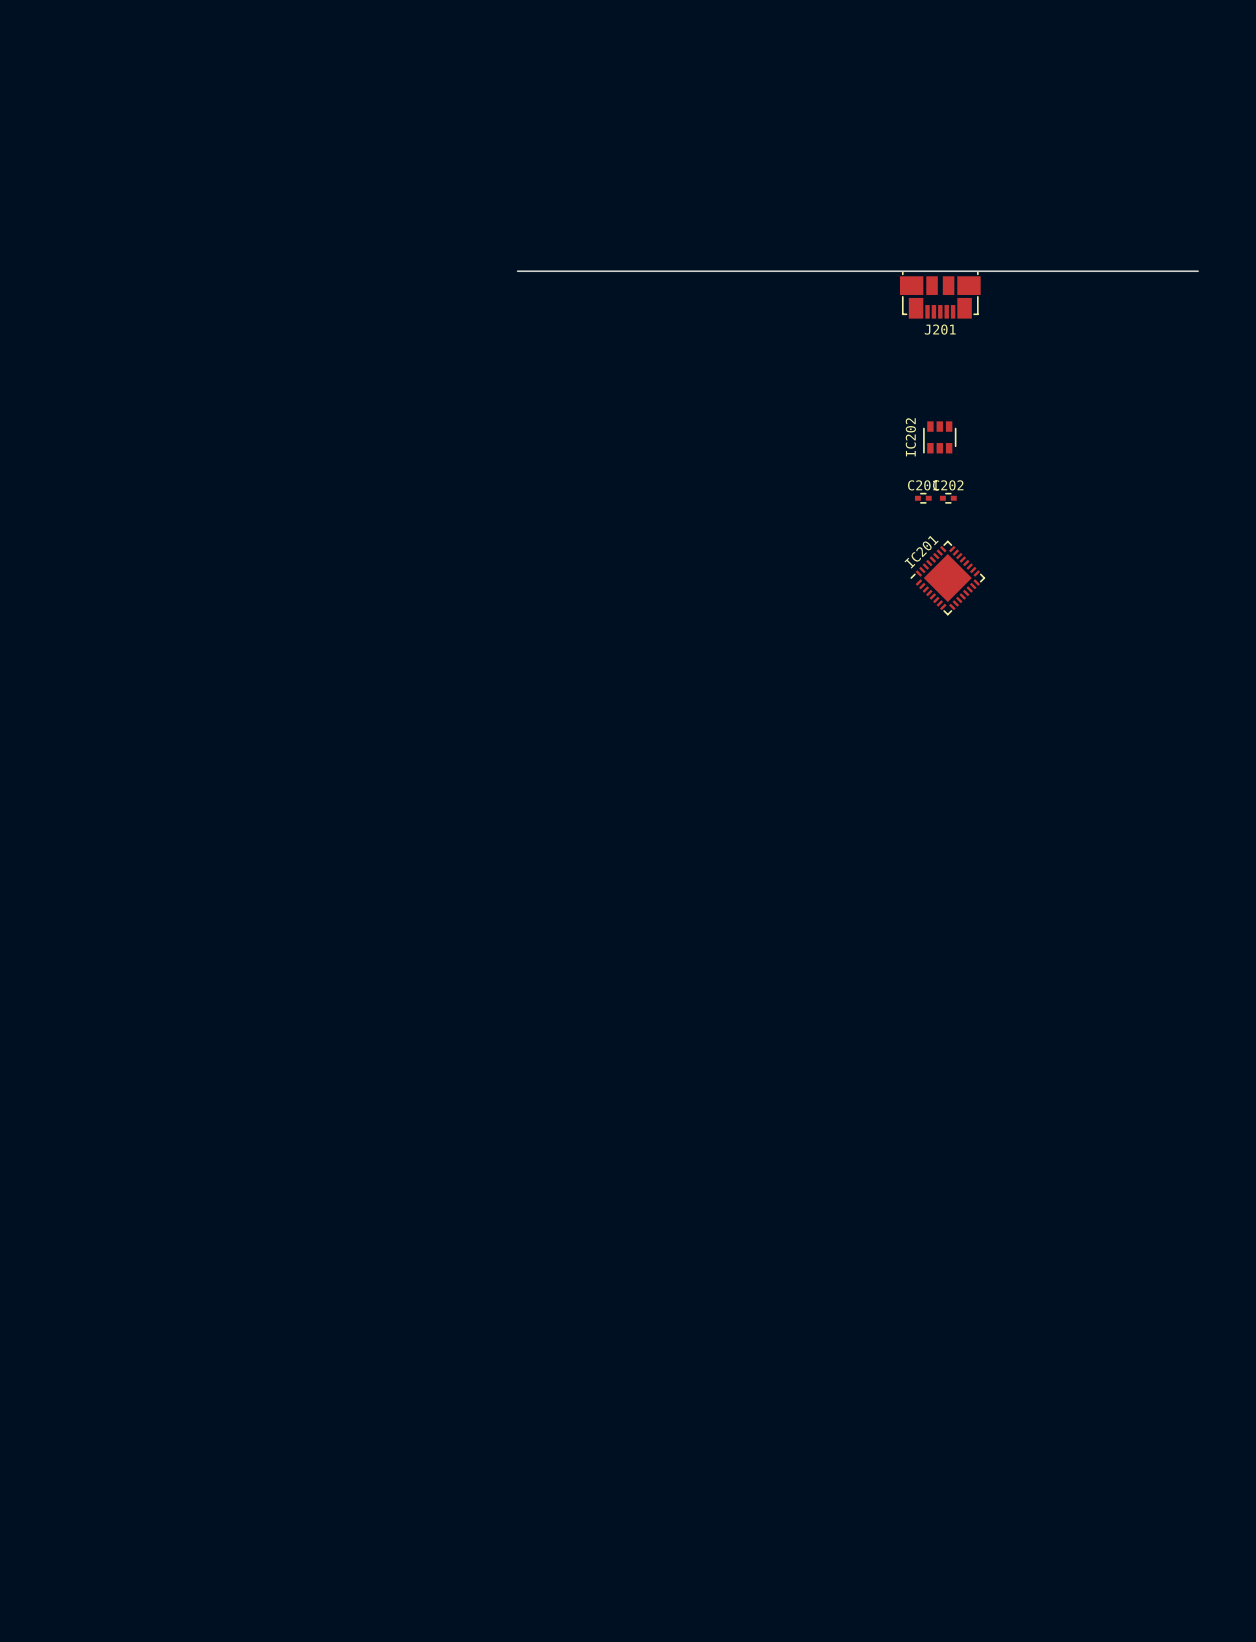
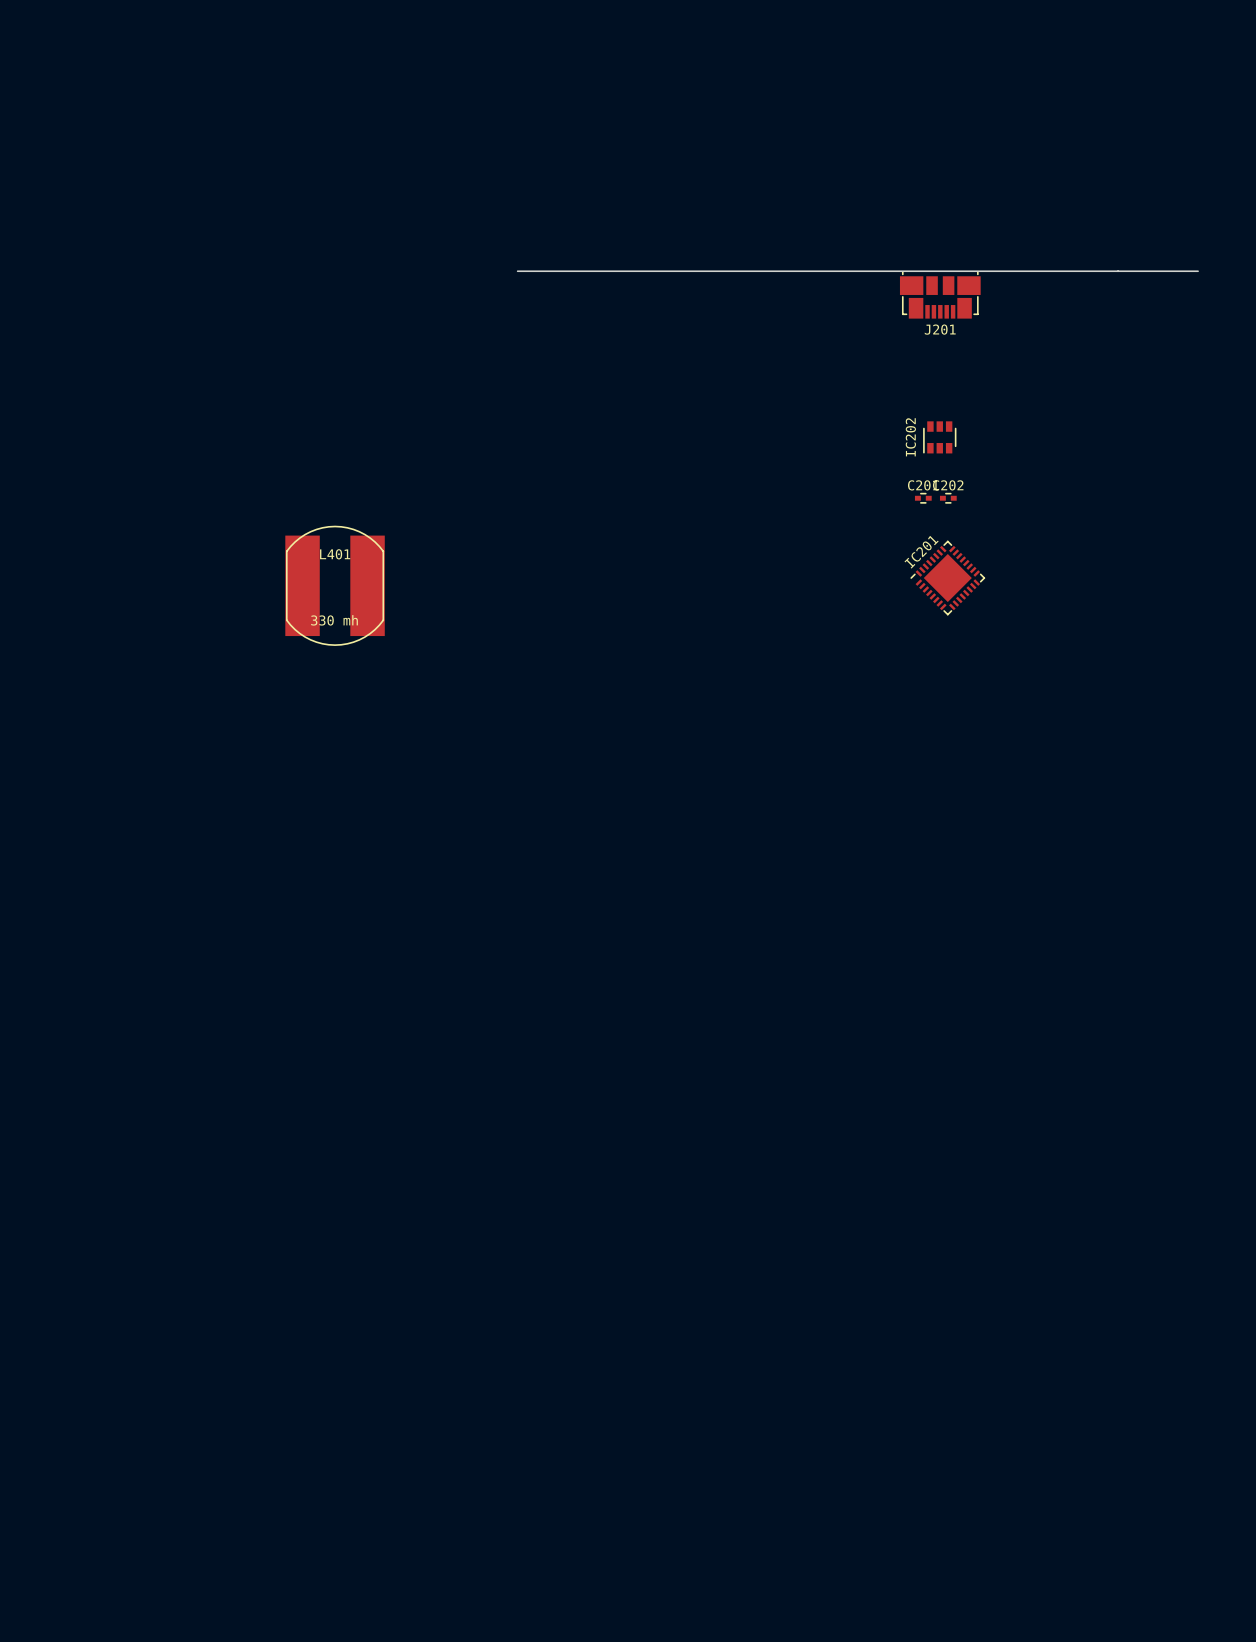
L401: none -> 330 mh (335, 585)

